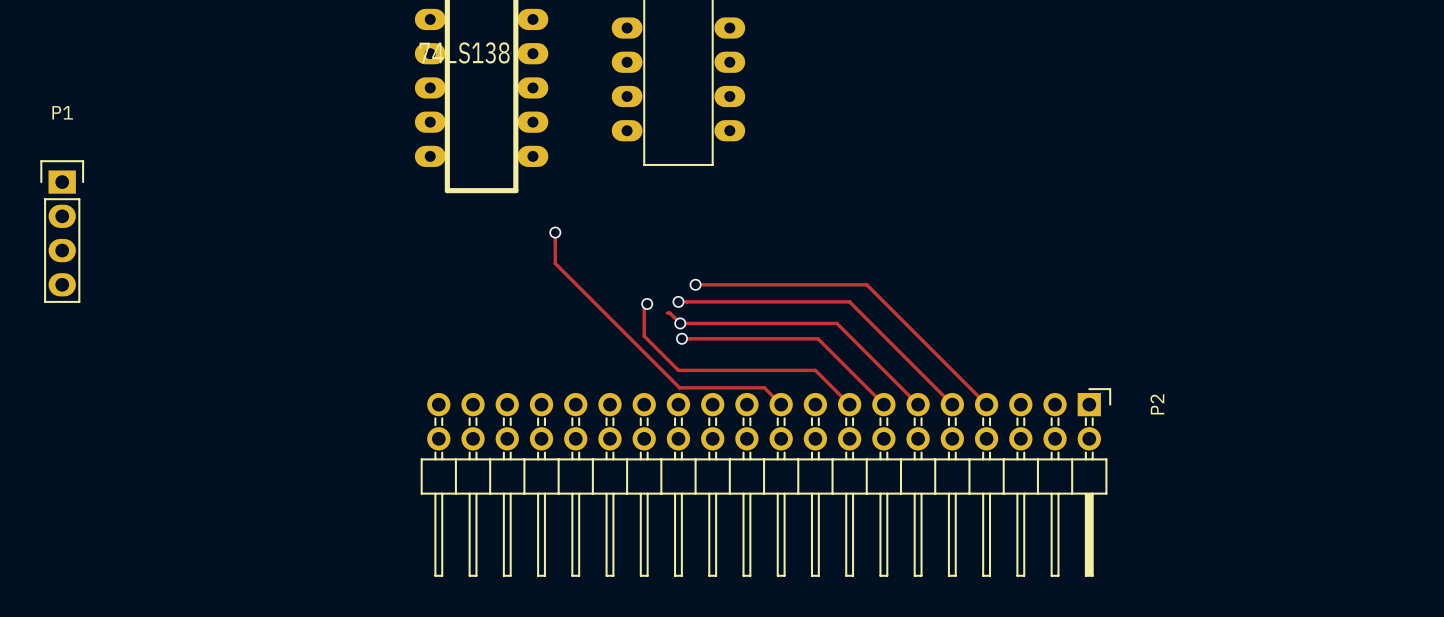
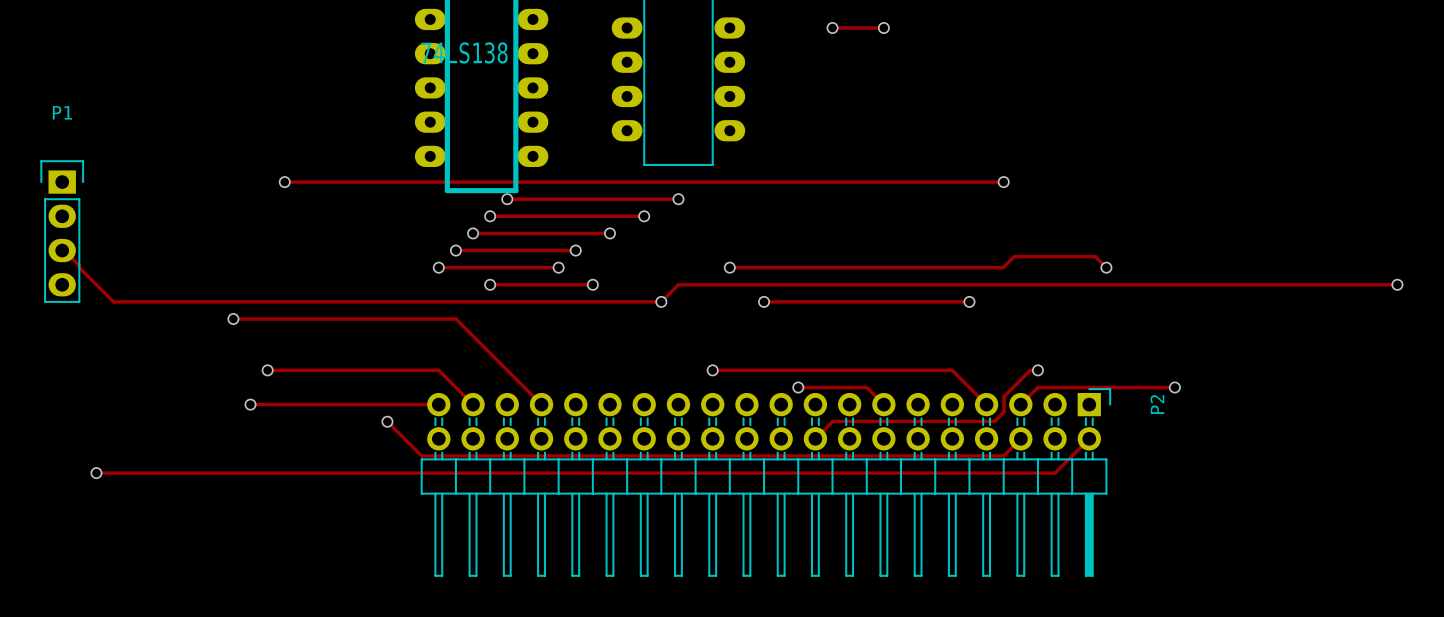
track: none -> (832, 28) (883, 28)
via: none -> (832, 28)
via: none -> (883, 28)
track: none -> (284, 182) (1003, 182)
via: none -> (284, 182)
via: none -> (1003, 182)
track: none -> (507, 199) (678, 199)
via: none -> (507, 199)
via: none -> (678, 199)
track: none -> (490, 216) (644, 216)
via: none -> (490, 216)
via: none -> (644, 216)
track: (555, 232) (555, 263) (679, 387) (764, 387) (781, 404) -> none
via: (555, 232) -> none
track: none -> (473, 233) (609, 233)
via: none -> (473, 233)
via: none -> (609, 233)
track: none -> (62, 250) (113, 301) (661, 301) (678, 284) (695, 284)
track: none -> (455, 250) (575, 250)
via: none -> (455, 250)
via: none -> (575, 250)
track: none -> (438, 267) (558, 267)
via: none -> (438, 267)
via: none -> (558, 267)
track: none -> (729, 267) (1003, 267) (1014, 256) (1095, 256) (1106, 267)
via: none -> (729, 267)
via: none -> (1106, 267)
track: none -> (490, 284) (592, 284)
via: none -> (490, 284)
via: none -> (592, 284)
via: (695, 284) -> none
track: (866, 284) (952, 370) -> (815, 370) (952, 370)
track: none -> (866, 284) (1397, 284)
via: none -> (1397, 284)
via: none -> (661, 301)
track: (678, 301) (764, 301) -> none
via: (678, 301) -> none
via: none -> (764, 301)
track: (849, 301) (952, 404) -> (849, 301) (969, 301)
via: none -> (969, 301)
track: (647, 303) (644, 306) (644, 336) (678, 370) (712, 370) -> none
via: (647, 303) -> none
track: (667, 313) (669, 313) (680, 323) (836, 323) (918, 404) -> none
track: none -> (233, 319) (455, 319) (541, 404)
via: none -> (233, 319)
via: (680, 323) -> none
track: (681, 338) (818, 338) (866, 387) -> (798, 387) (866, 387)
via: (681, 338) -> none
track: none -> (267, 370) (438, 370) (473, 404)
via: none -> (267, 370)
via: none -> (712, 370)
track: (815, 370) (849, 404) -> none
track: none -> (1037, 370) (1030, 370) (1004, 396) (1004, 411) (994, 421) (832, 421) (815, 438)
via: none -> (1037, 370)
via: none -> (798, 387)
track: none -> (1174, 387) (1037, 387) (1020, 404)
via: none -> (1174, 387)
track: none -> (250, 404) (438, 404)
via: none -> (250, 404)
track: none -> (387, 421) (421, 455) (1003, 455) (1020, 438)
via: none -> (387, 421)
track: none -> (1089, 438) (1055, 473) (96, 473)
via: none -> (96, 473)

